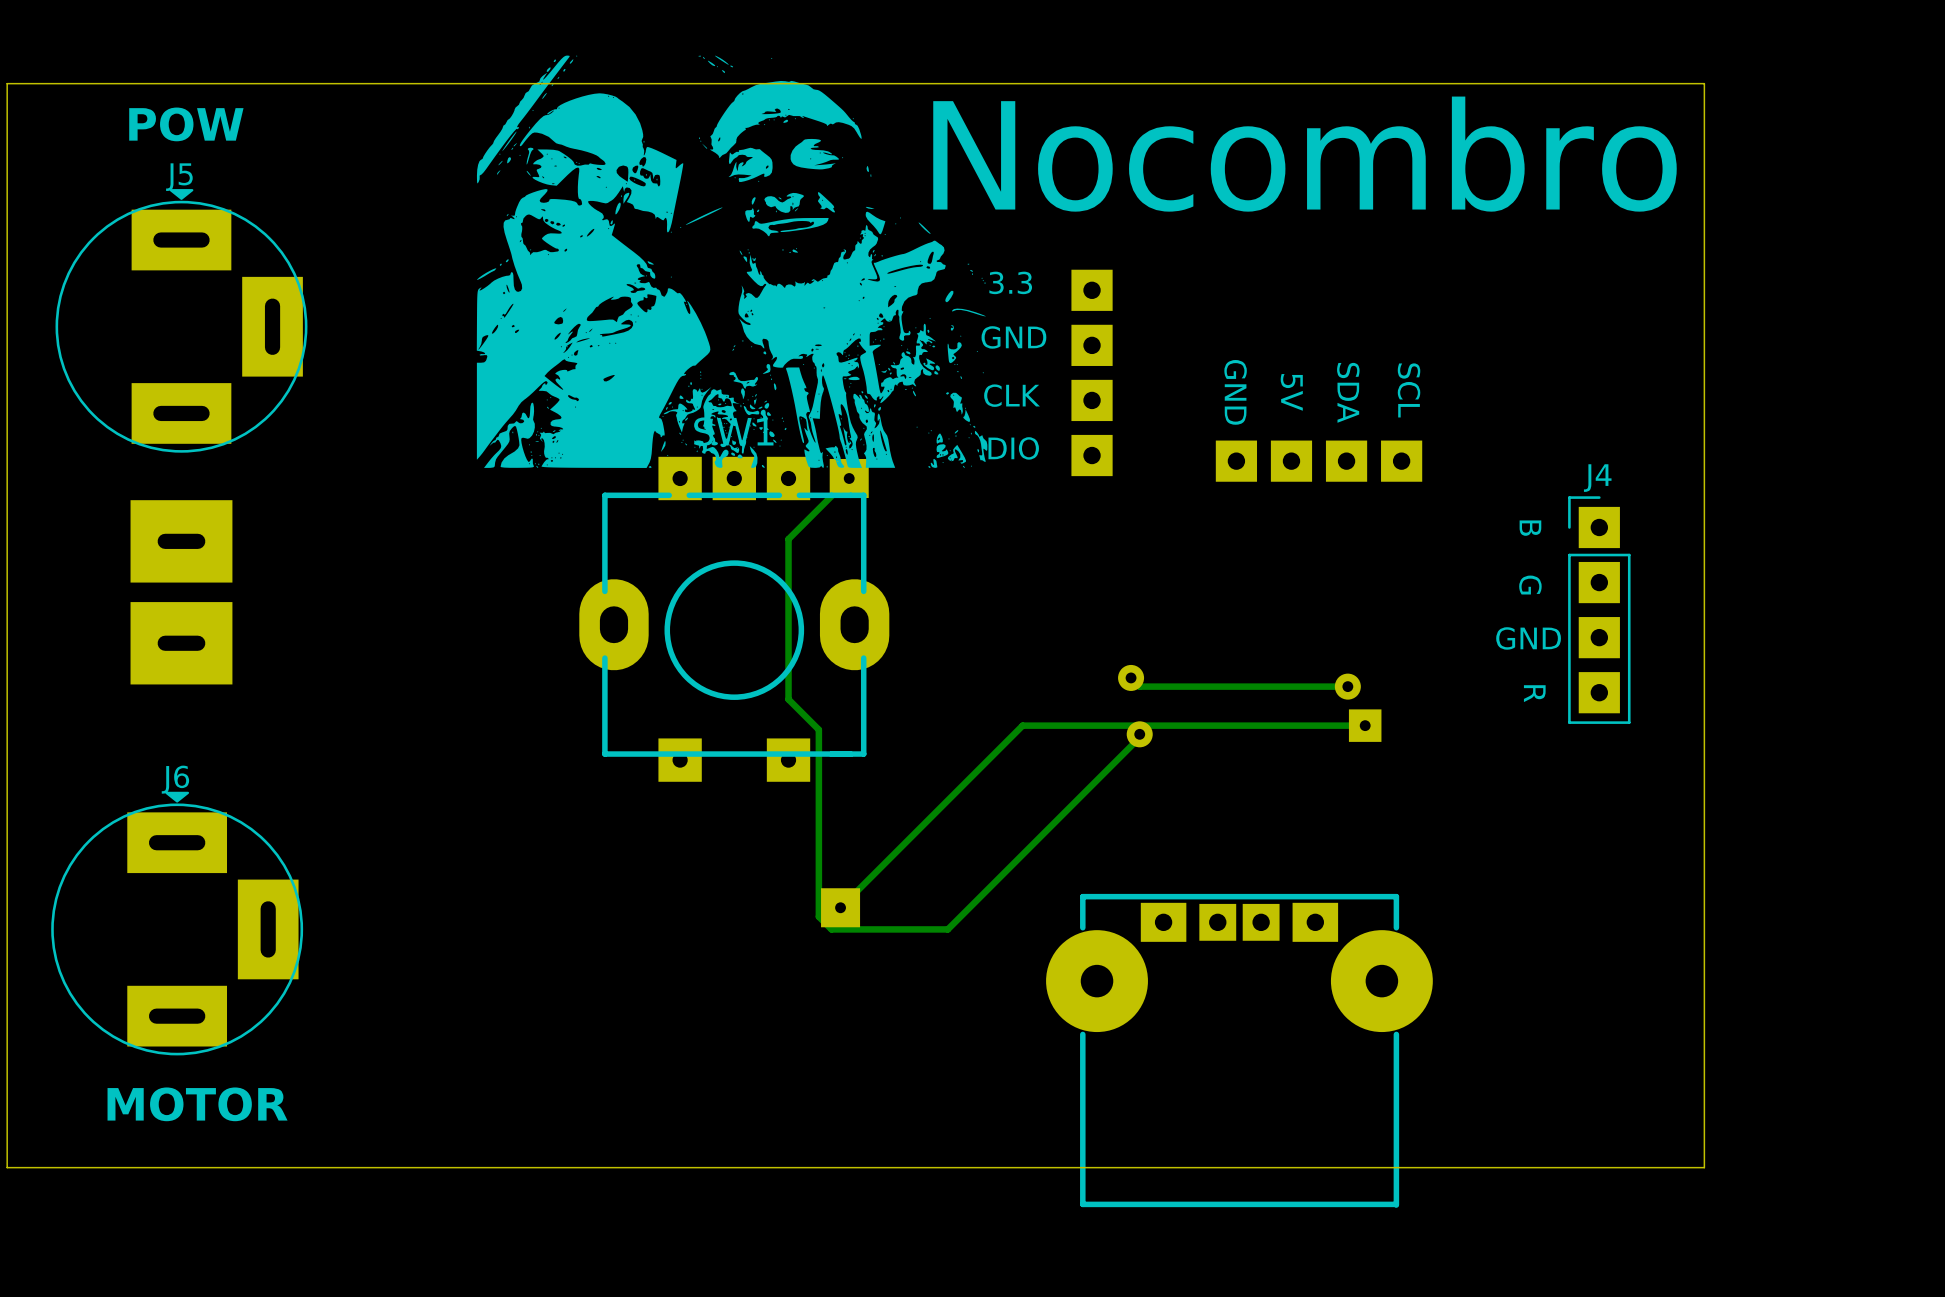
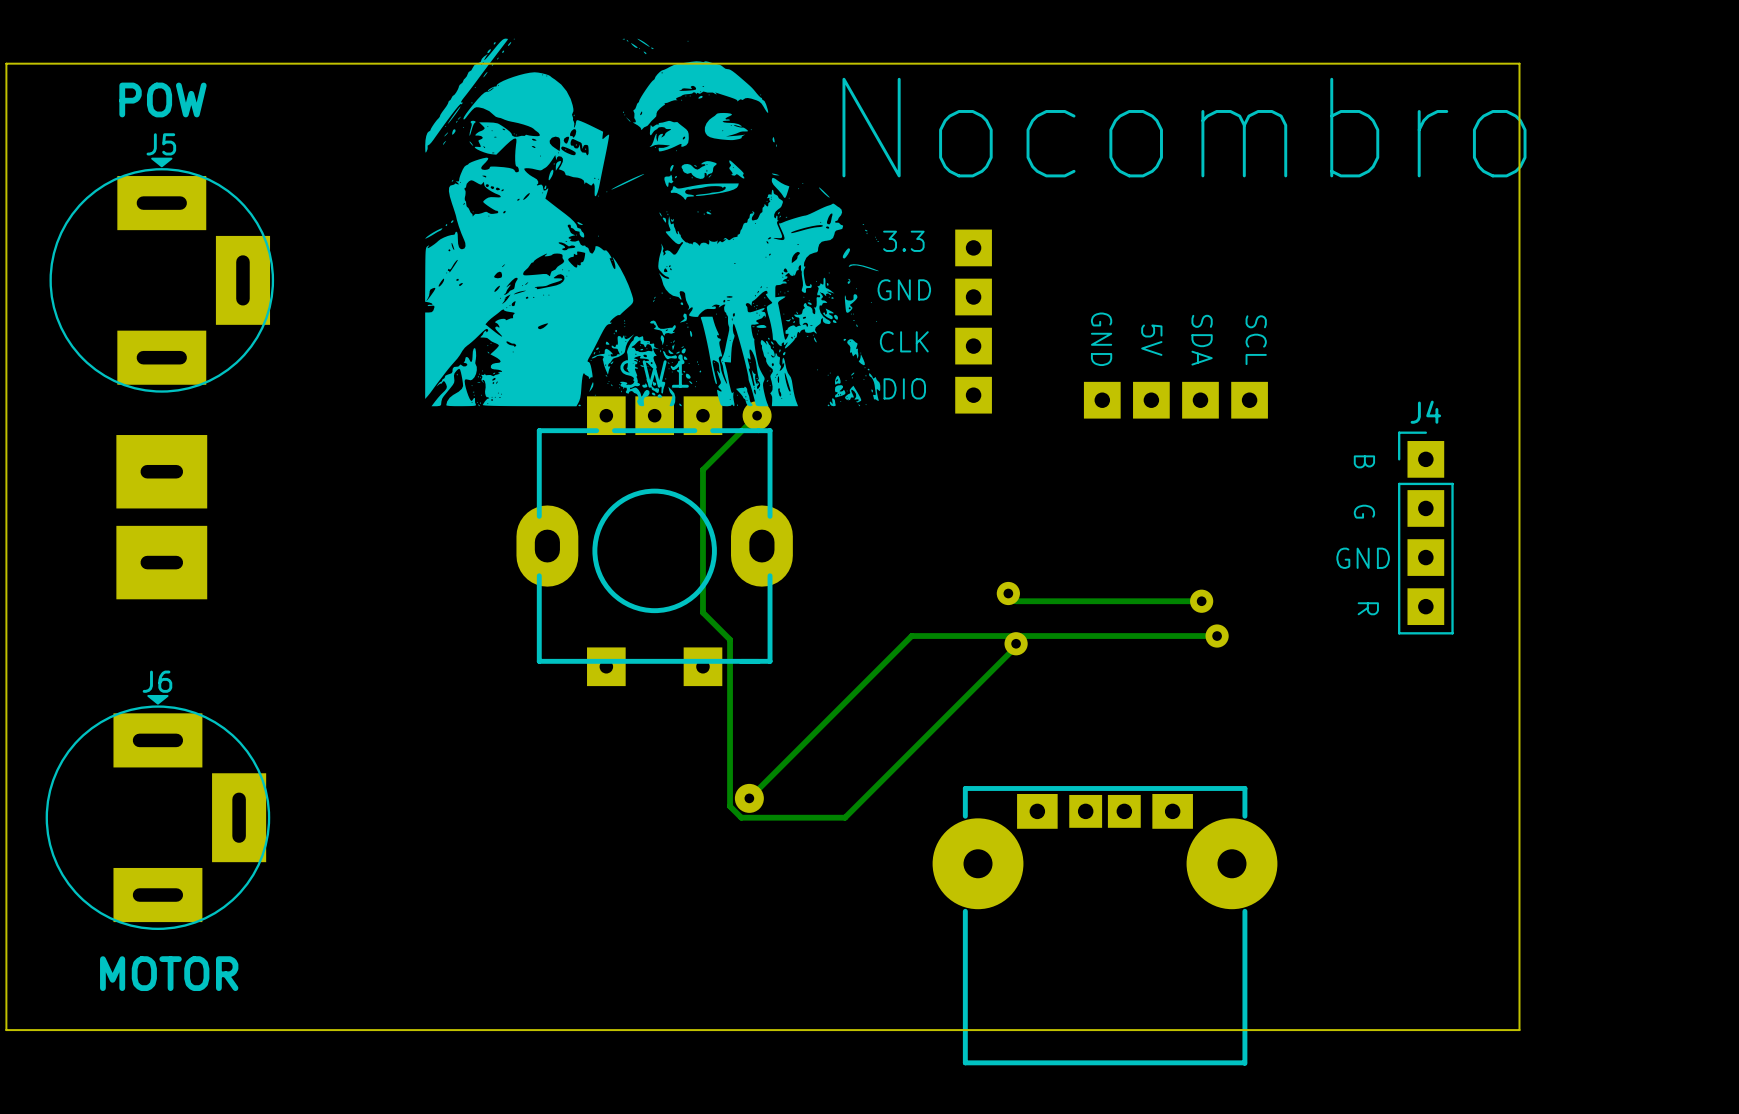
part footprint: [829, 458, 869, 499] -> [742, 401, 772, 431]
part footprint: [1348, 709, 1382, 742] -> [1205, 624, 1229, 648]
part footprint: [821, 888, 861, 928] -> [734, 783, 764, 813]

